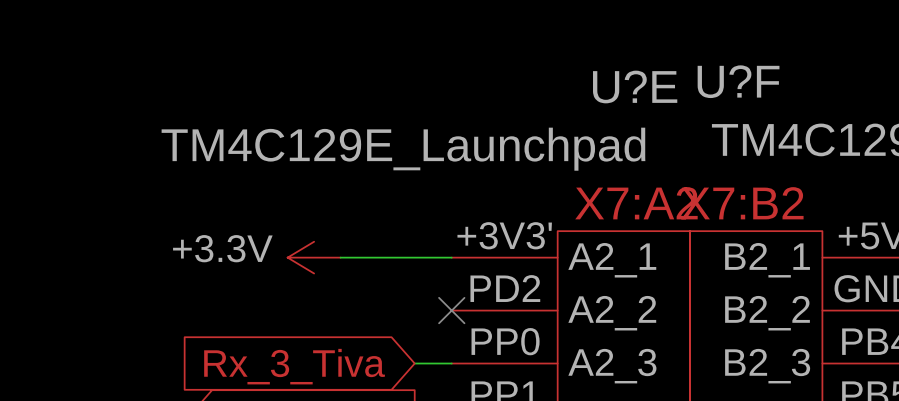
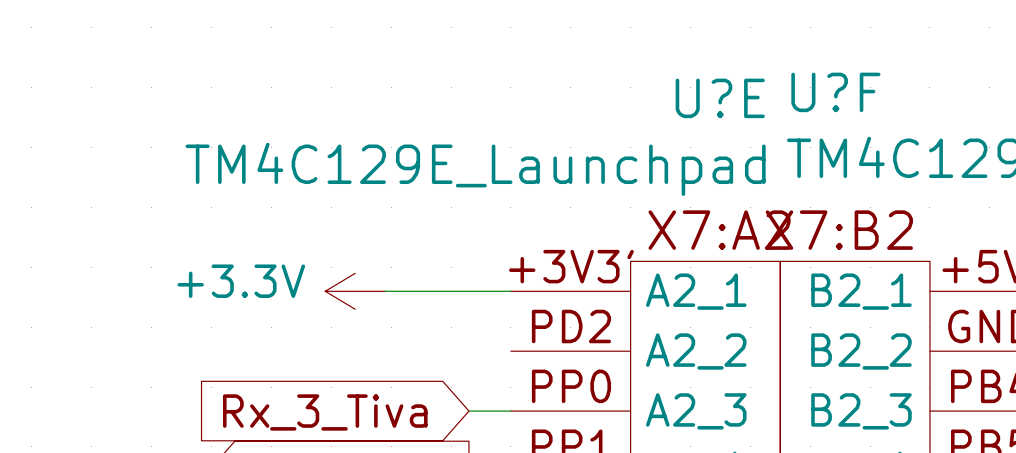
no-connect mark: (451, 310) -> none

